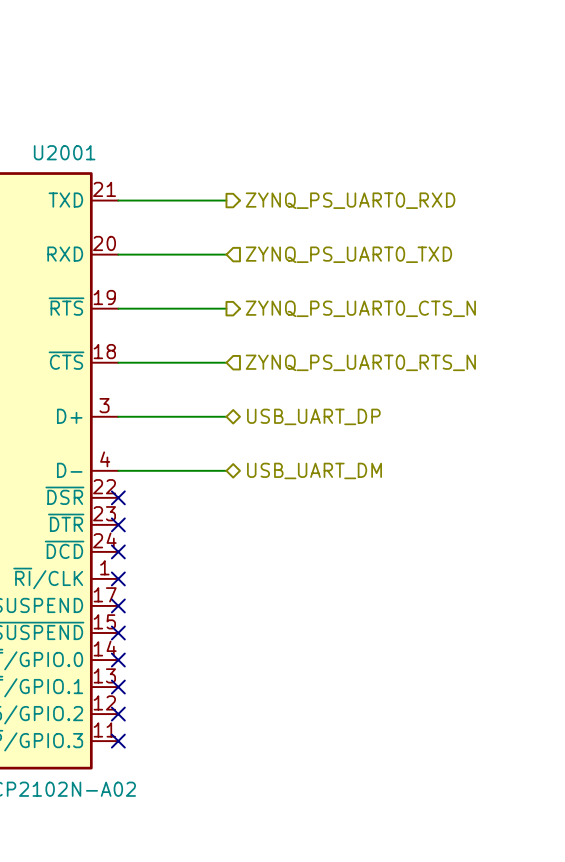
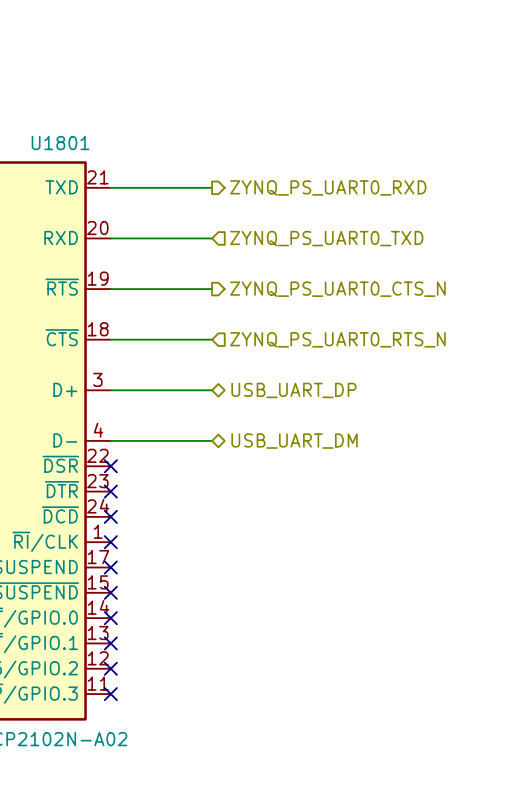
U2001 name: U2001 (64, 152) -> U1801 (60, 143)

